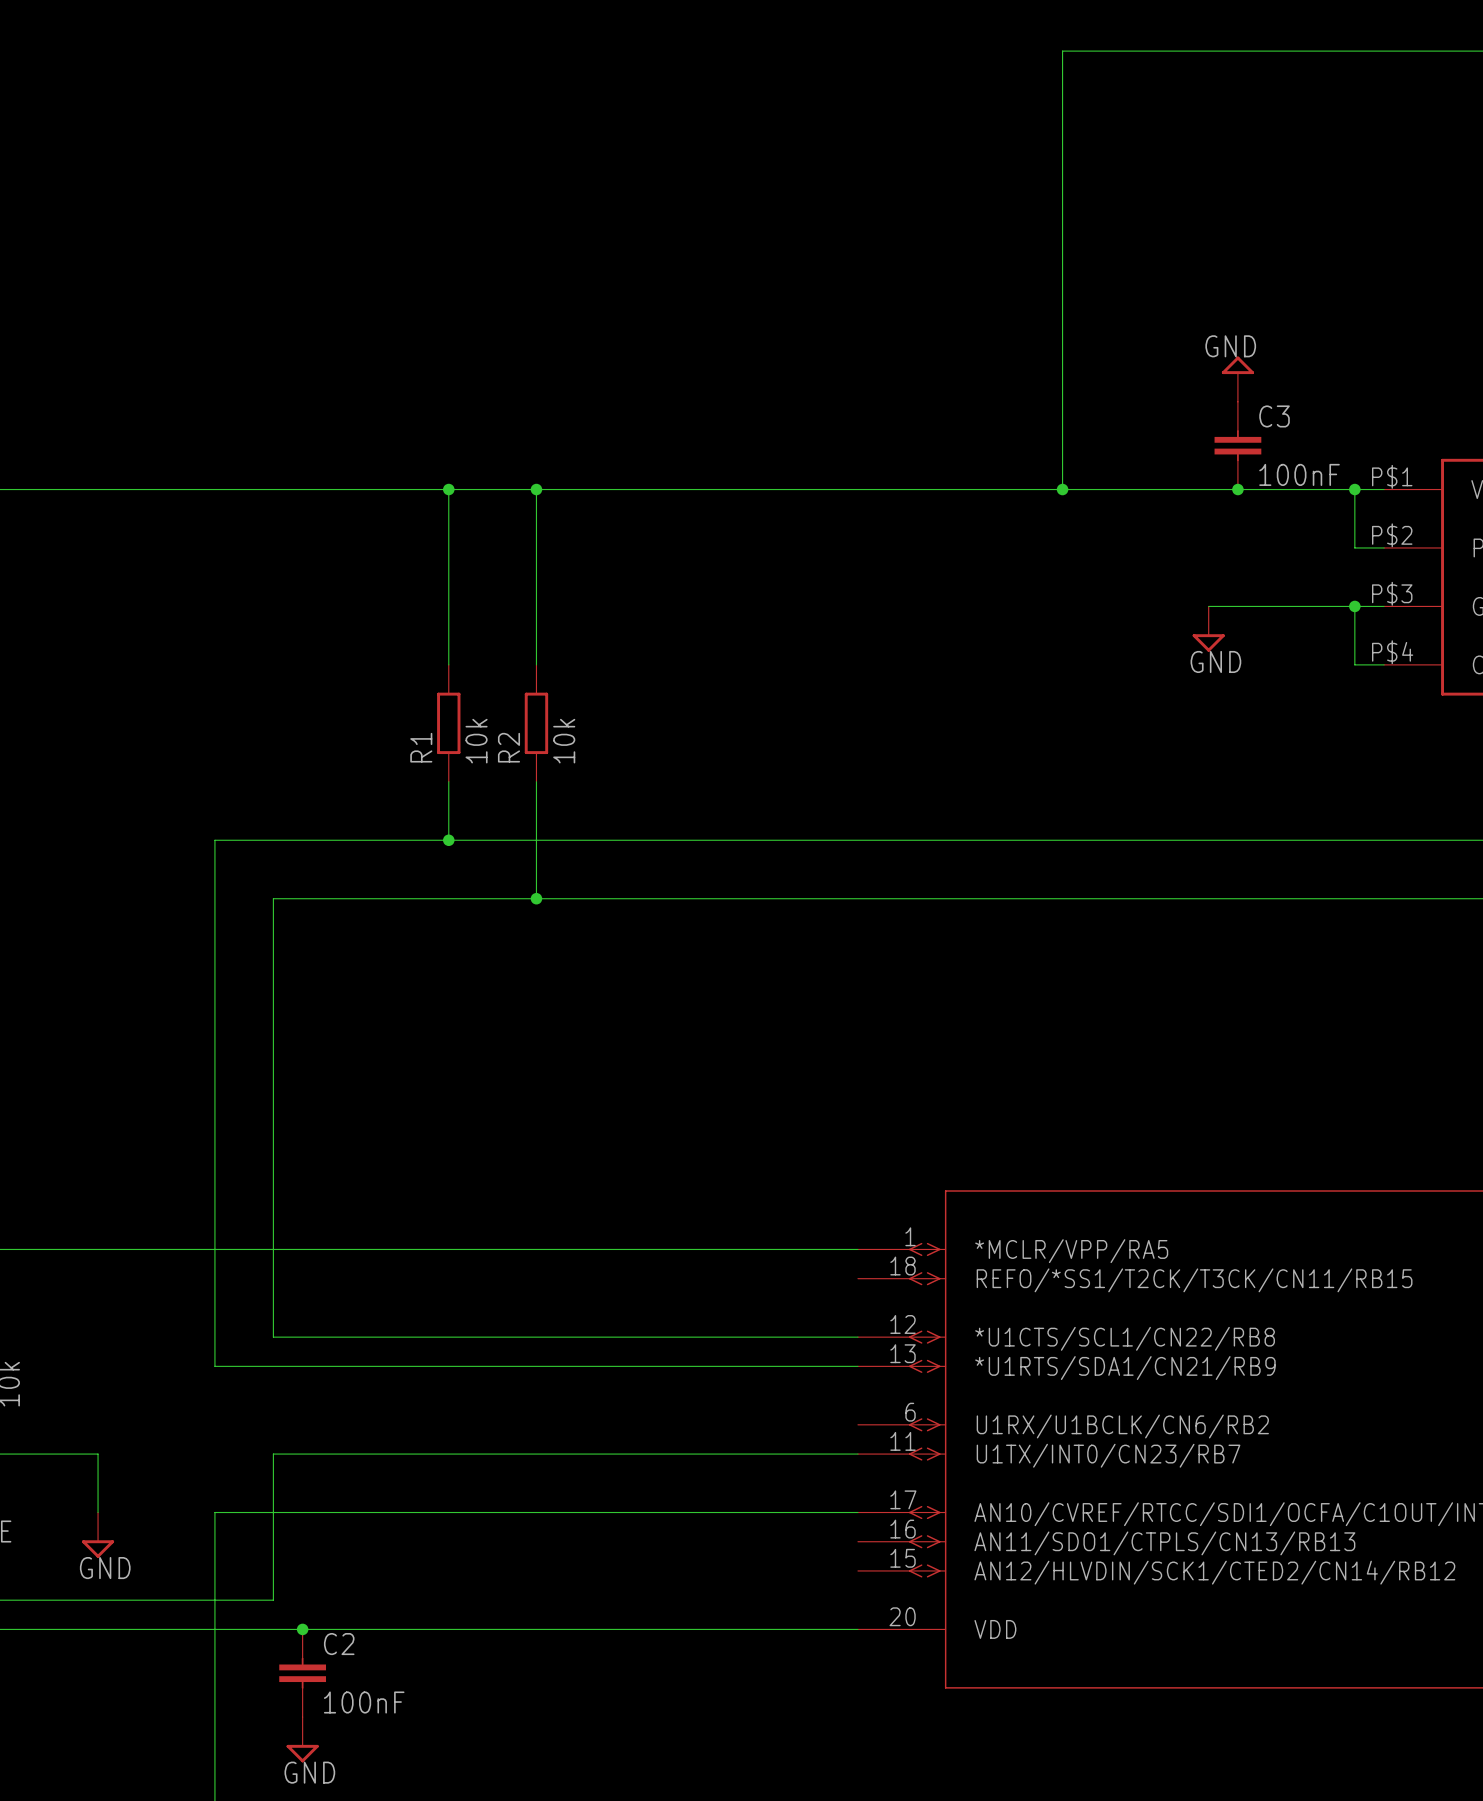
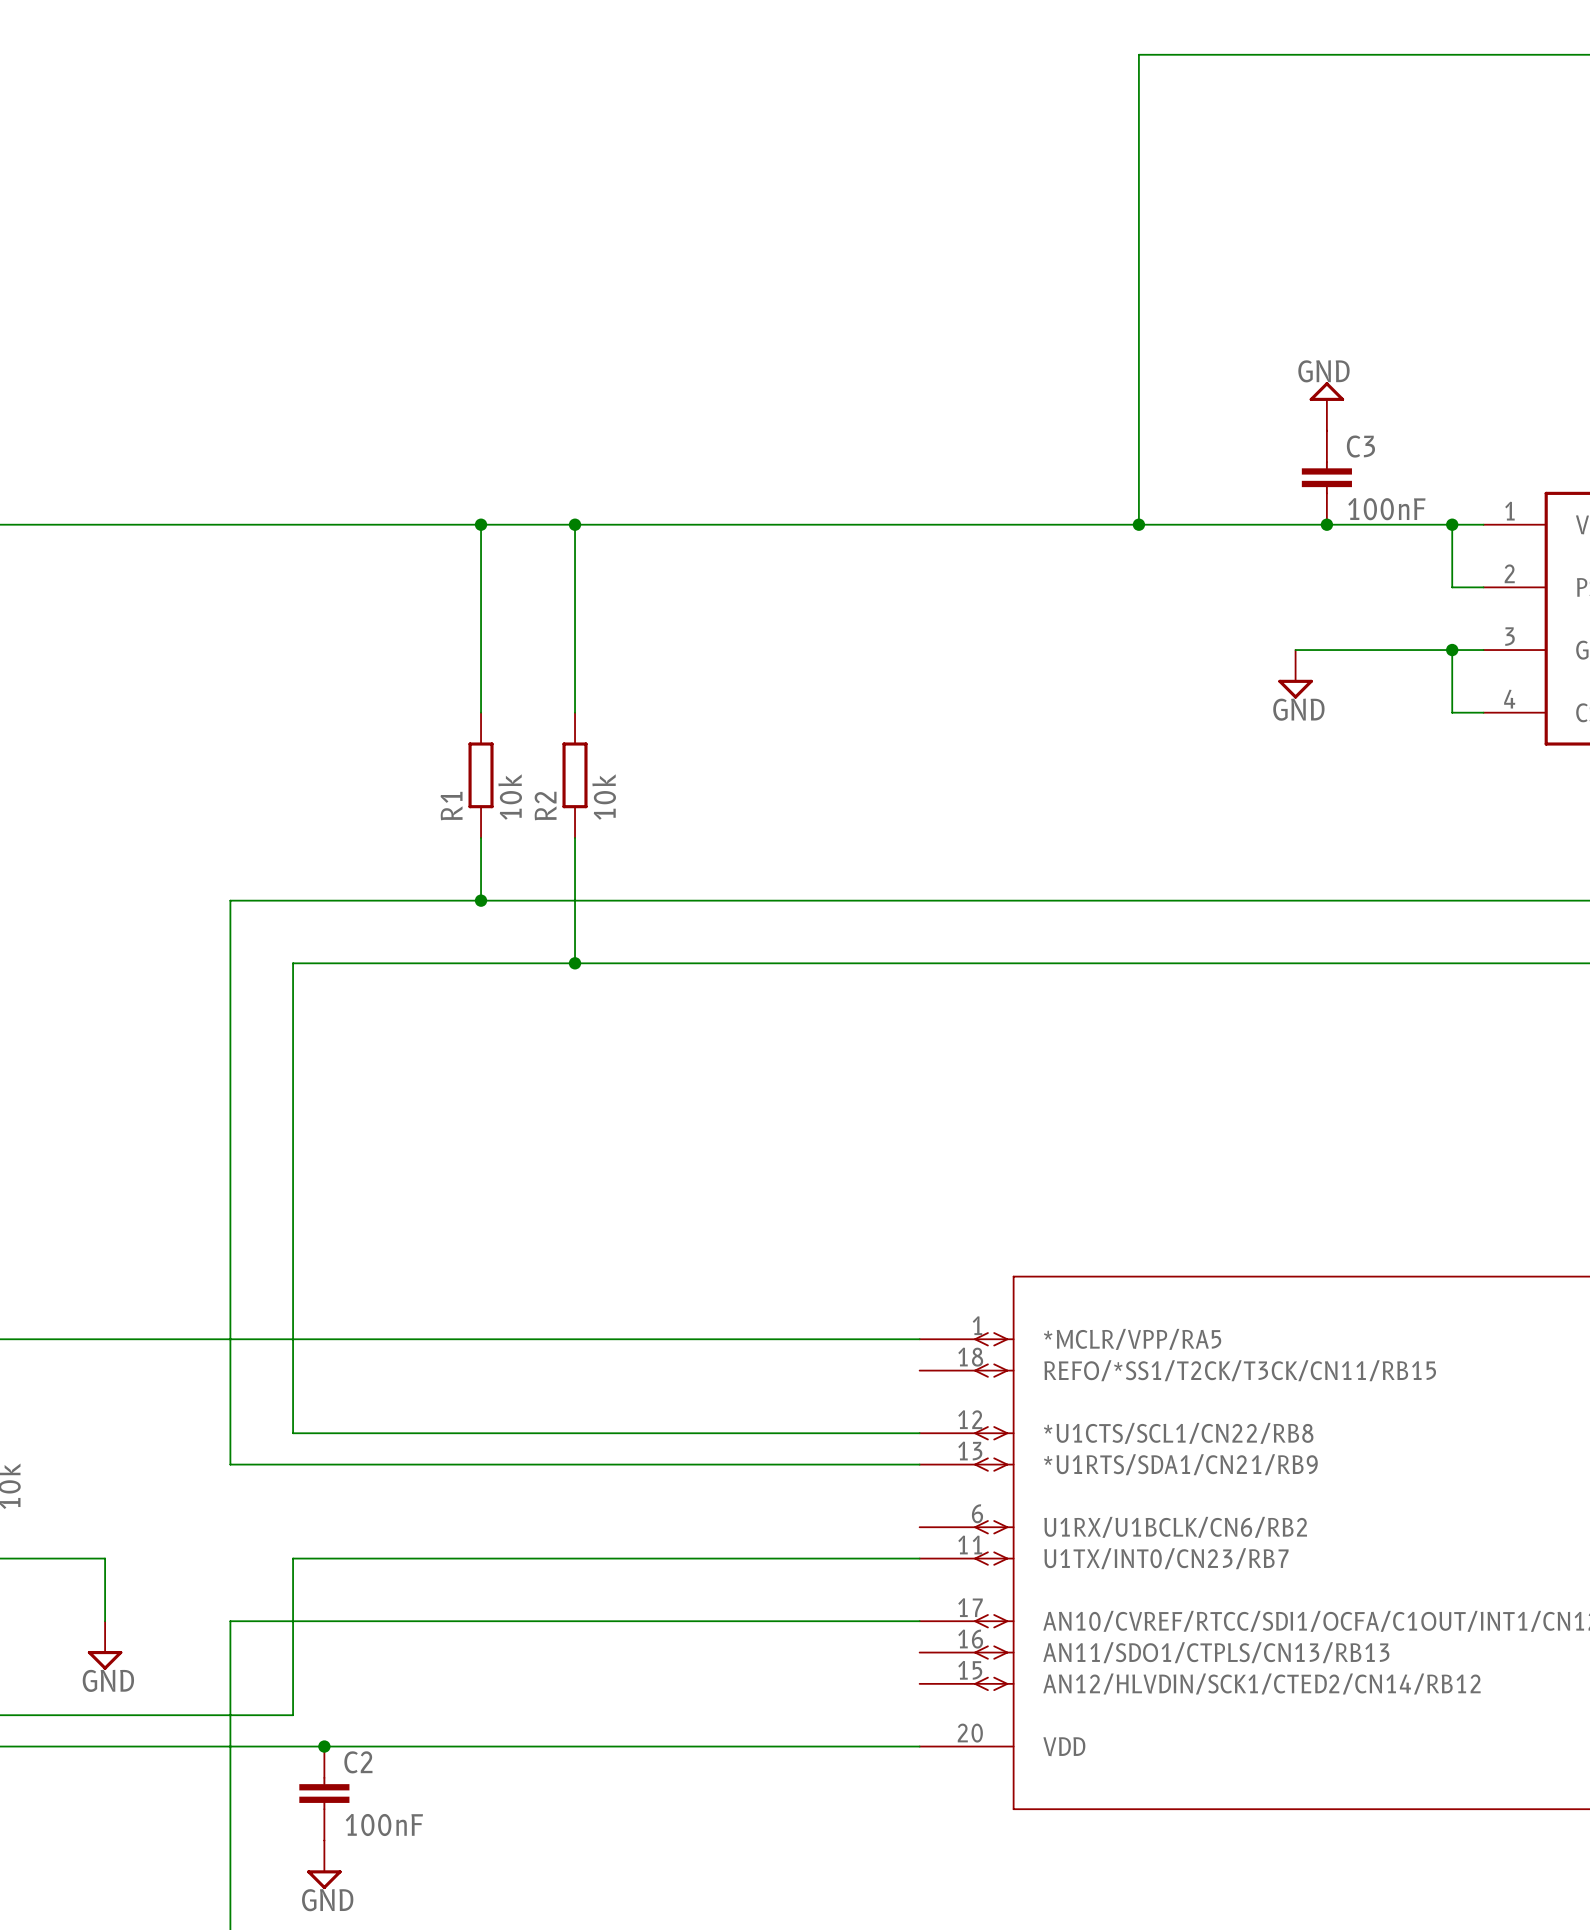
part pin number: P$1 (1392, 476) -> 1 (1509, 511)
part pin number: P$2 (1392, 535) -> 2 (1509, 573)
part pin number: P$3 (1392, 593) -> 3 (1510, 636)
part pin number: P$4 (1392, 652) -> 4 (1509, 699)

